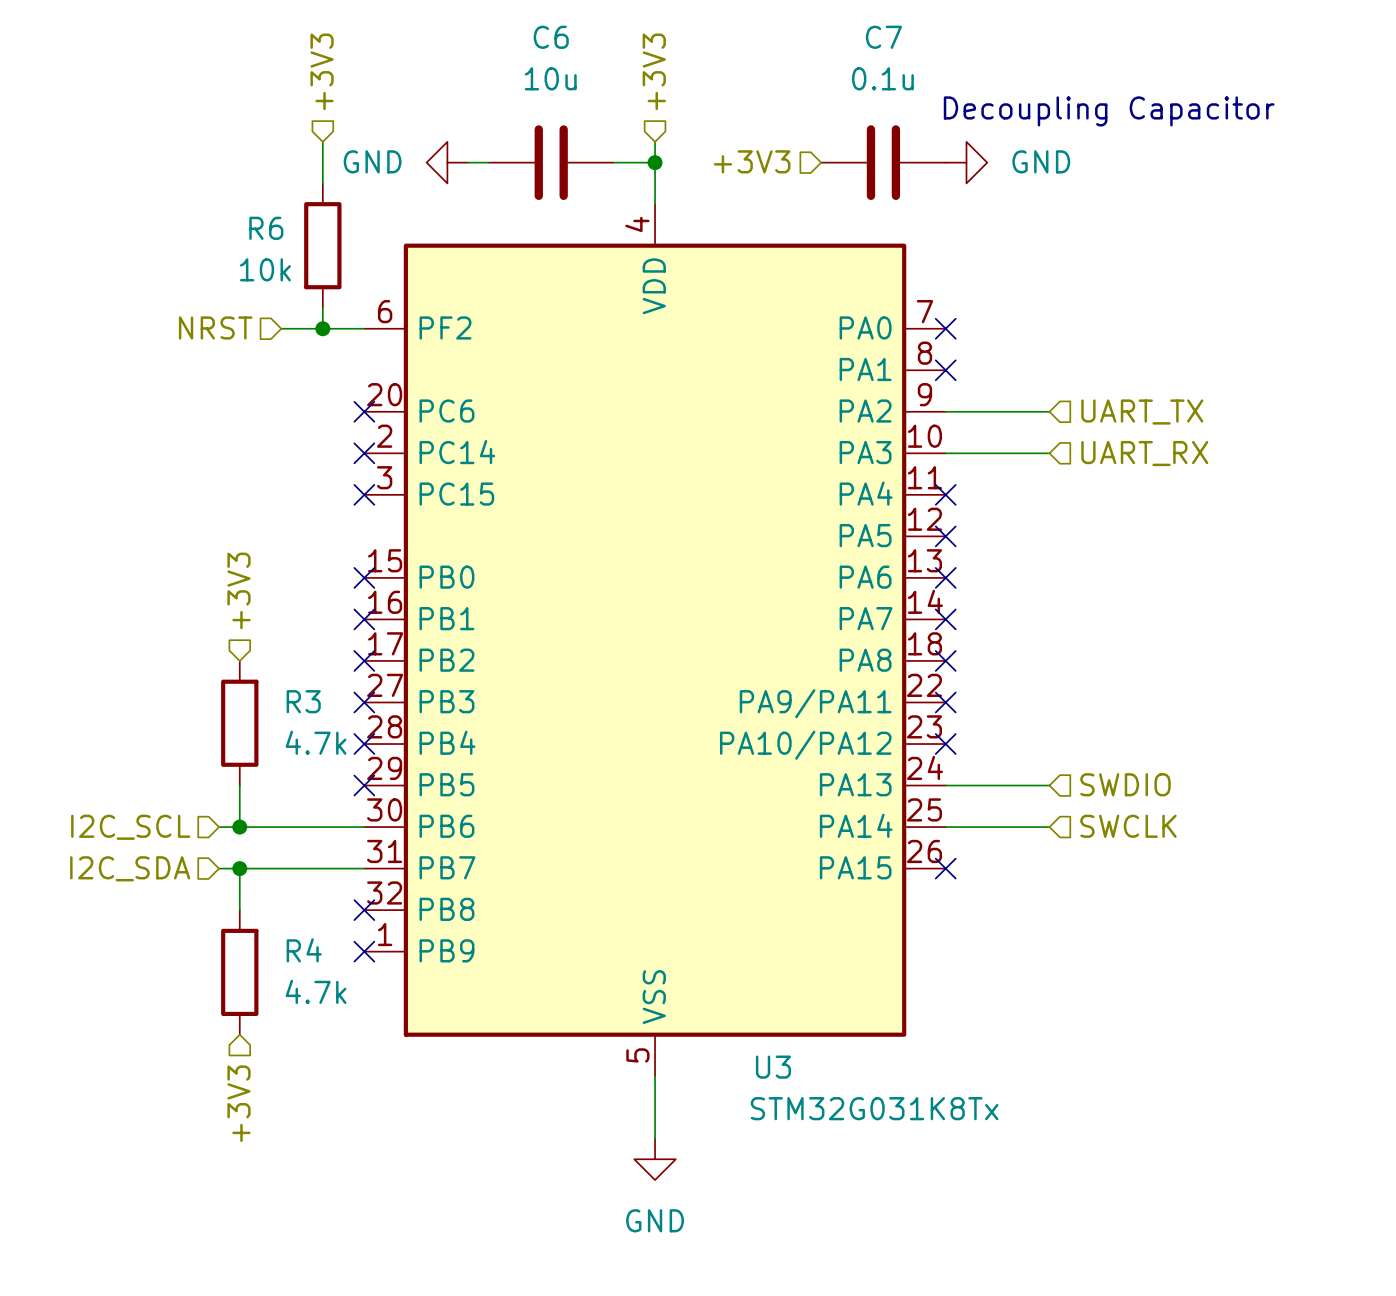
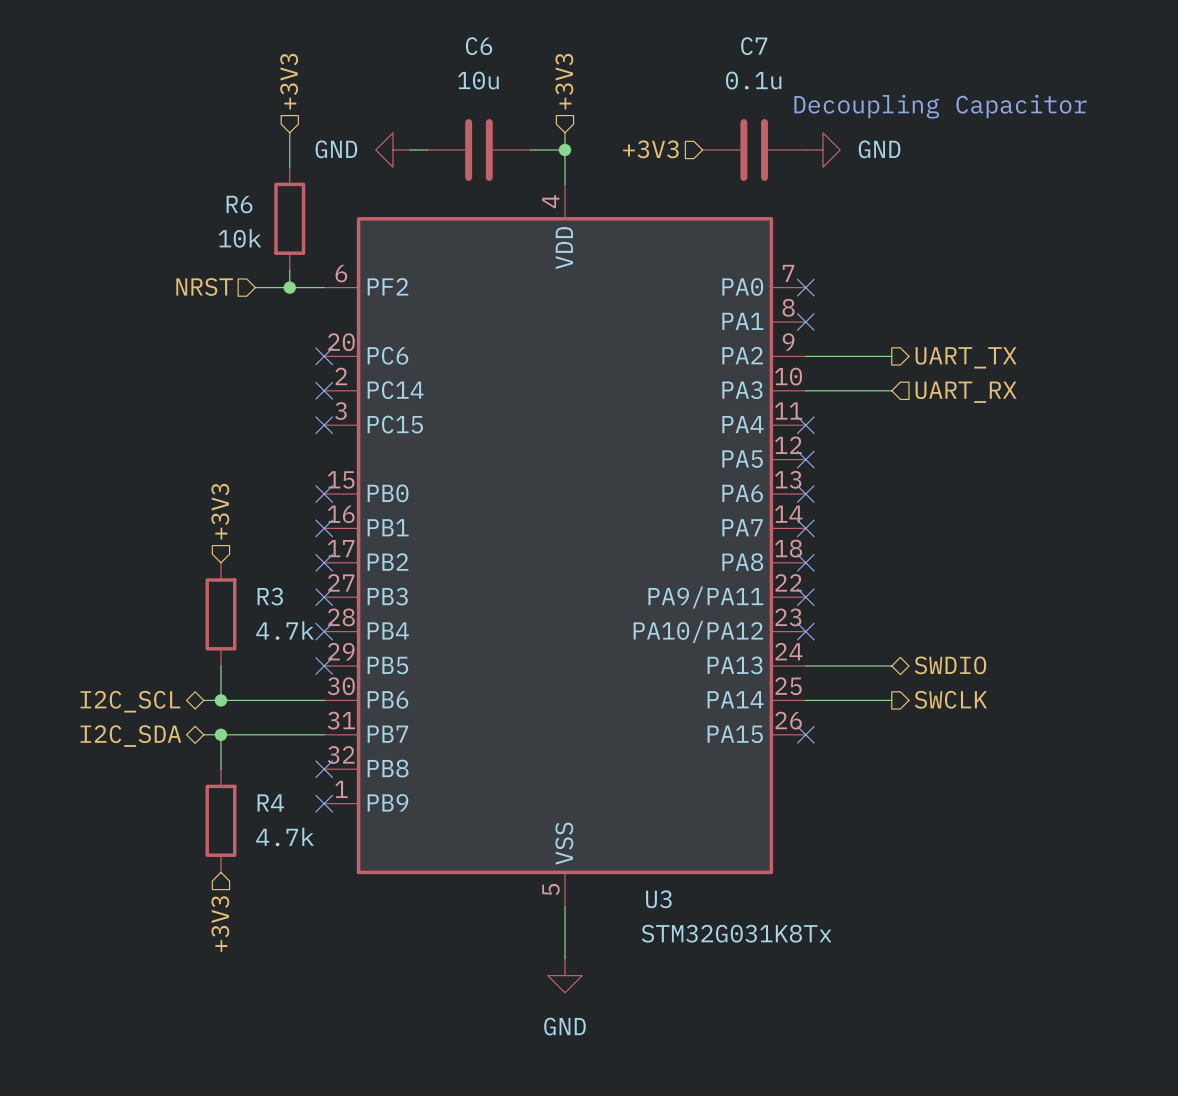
hierarchical label shape: input (1142, 412) -> output (966, 357)
hierarchical label shape: input (1125, 784) -> bidirectional (950, 665)
hierarchical label shape: input (1128, 826) -> output (950, 699)
hierarchical label shape: input (130, 827) -> bidirectional (130, 701)
hierarchical label shape: input (130, 868) -> bidirectional (130, 736)

